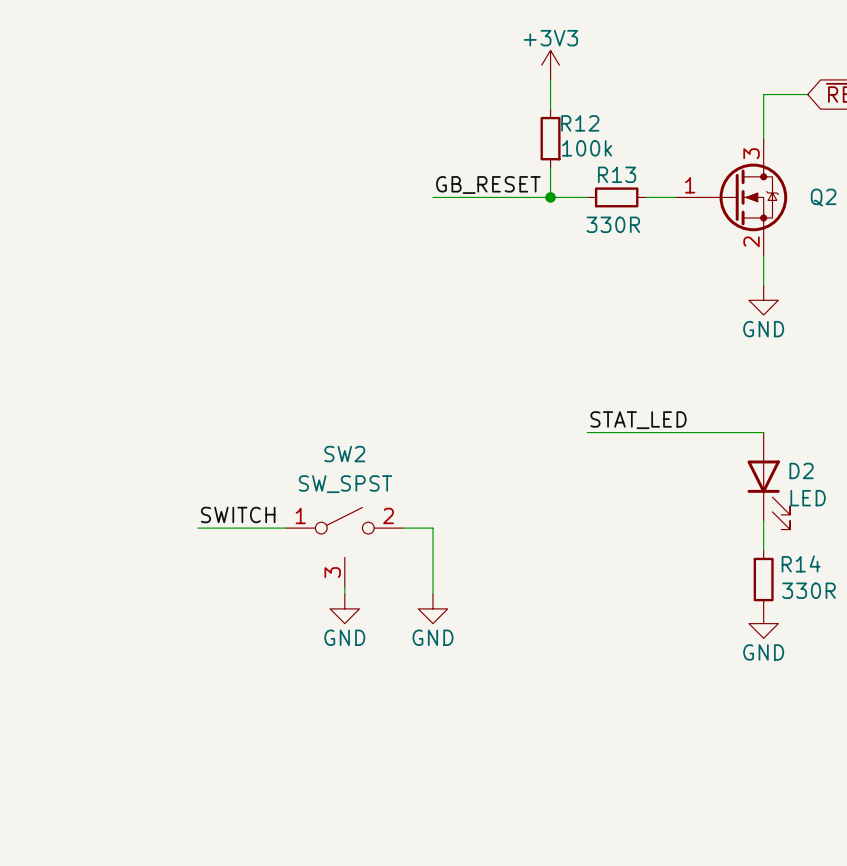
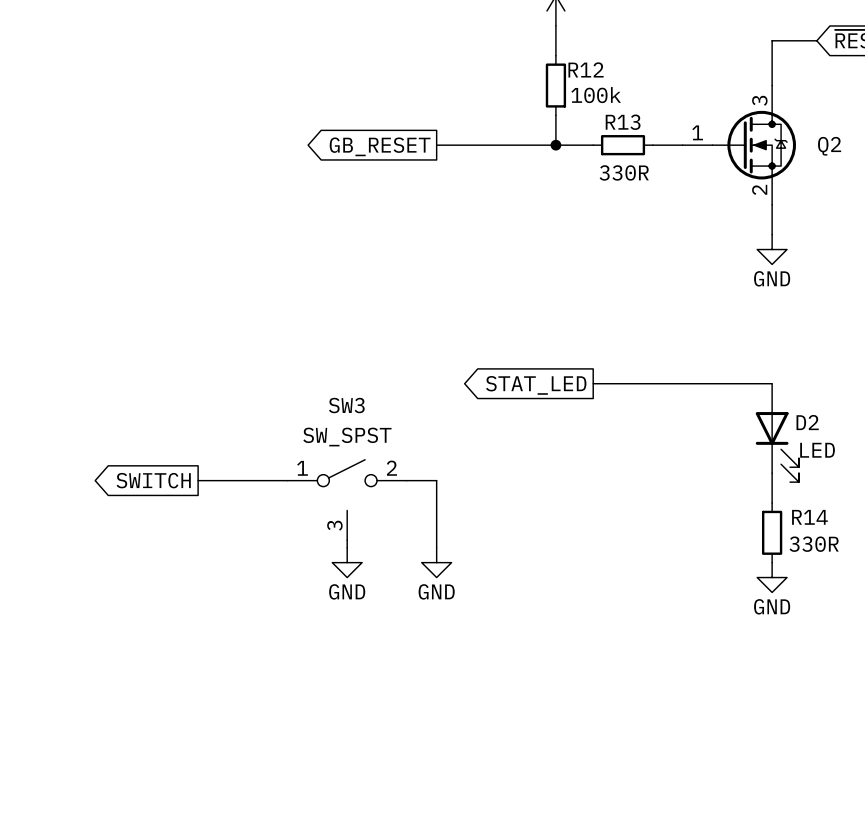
label: GB_RESET (488, 185) -> none
global label: none -> GB_RESET (380, 146)
label: STAT_LED (638, 420) -> none
global label: none -> STAT_LED (536, 385)
SW2 name: SW2 (344, 454) -> SW3 (346, 405)
label: SWITCH (238, 514) -> none
global label: none -> SWITCH (153, 480)

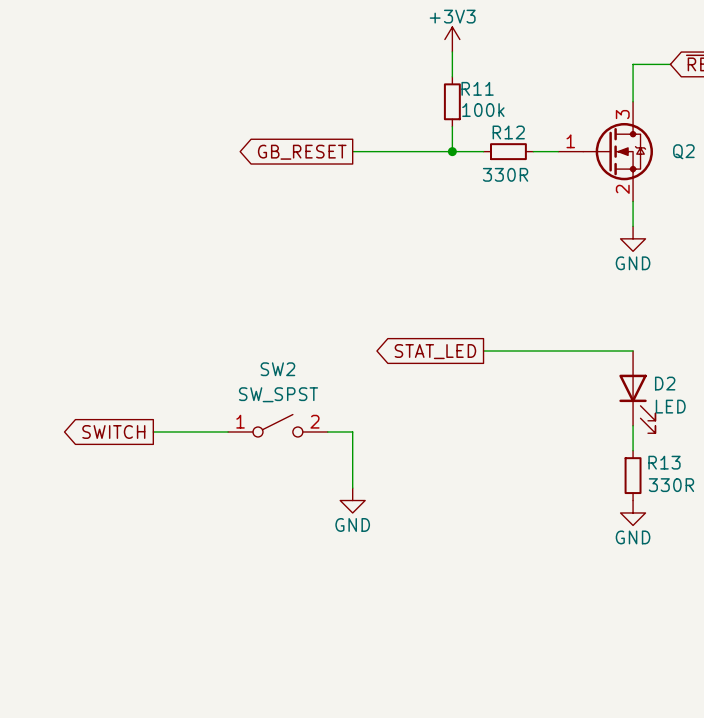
R12 name: R12 (586, 69) -> R11 (477, 88)
R13 name: R13 (623, 122) -> R12 (508, 132)
SW2: none -> SW_SPST (277, 425)
SW3: SW_SPST (347, 500) -> none
R14 name: R14 (809, 517) -> R13 (664, 462)
wire: (347, 540) (347, 547) -> none
power symbol: GND (347, 562) -> none

